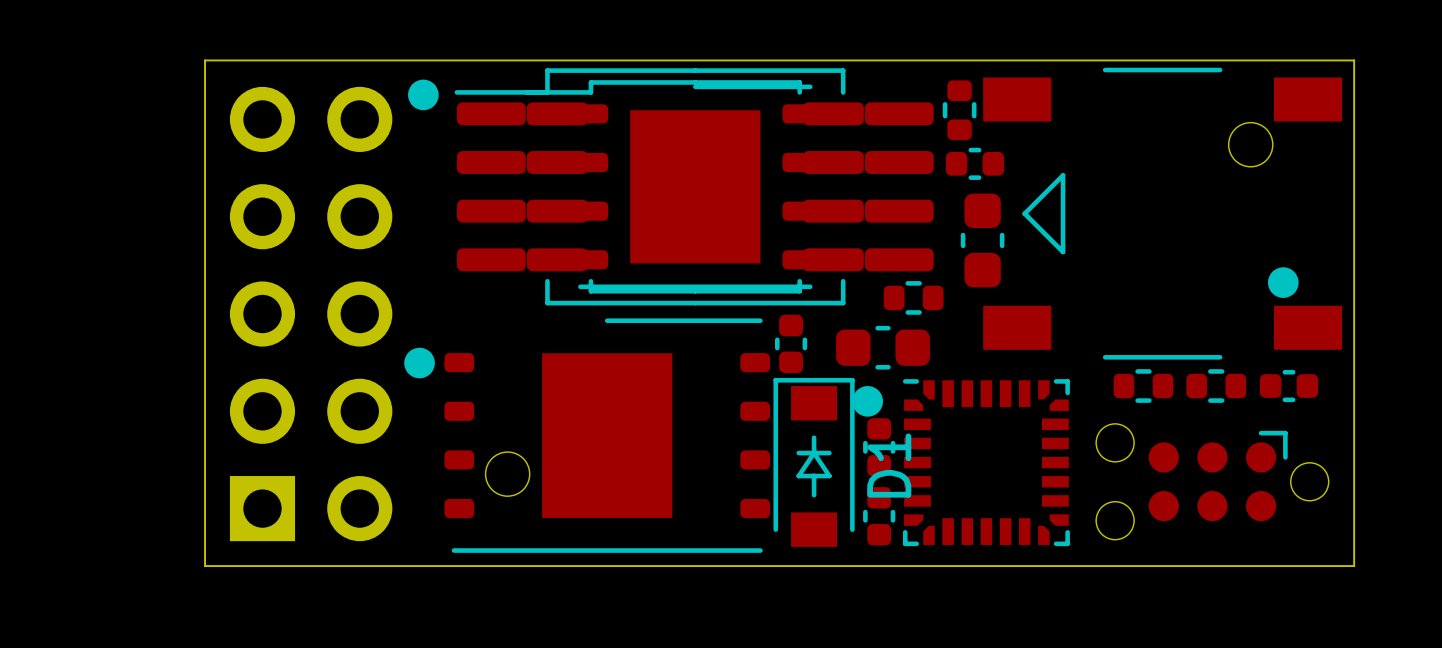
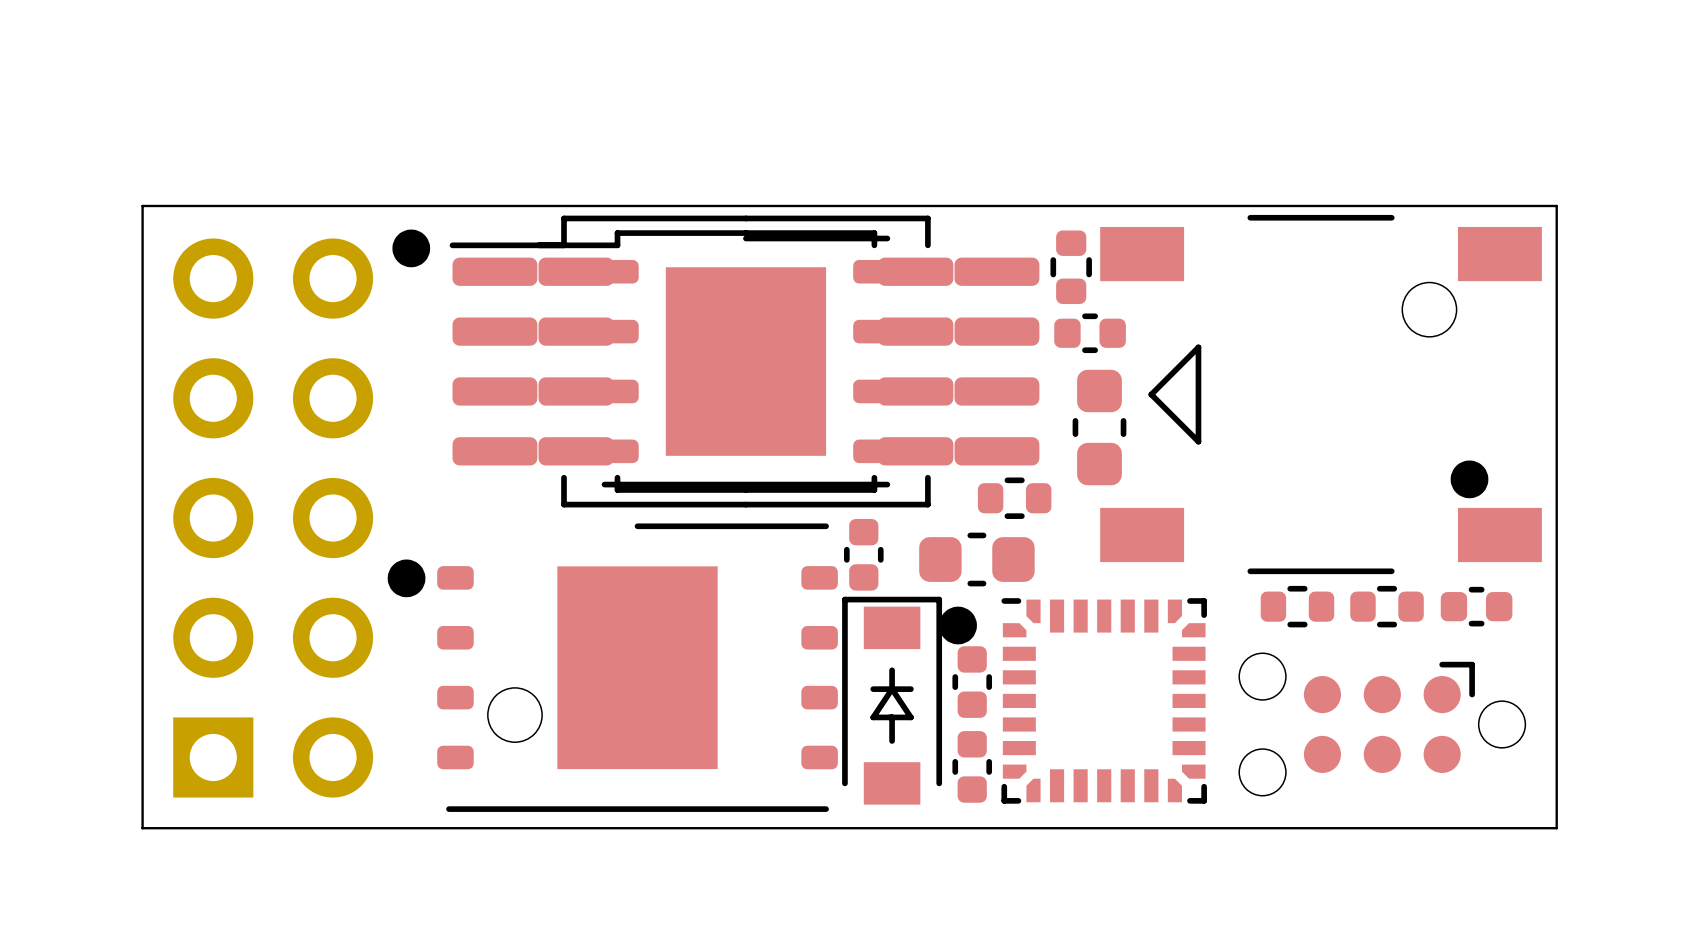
D1 name: D1 (889, 465) -> none

